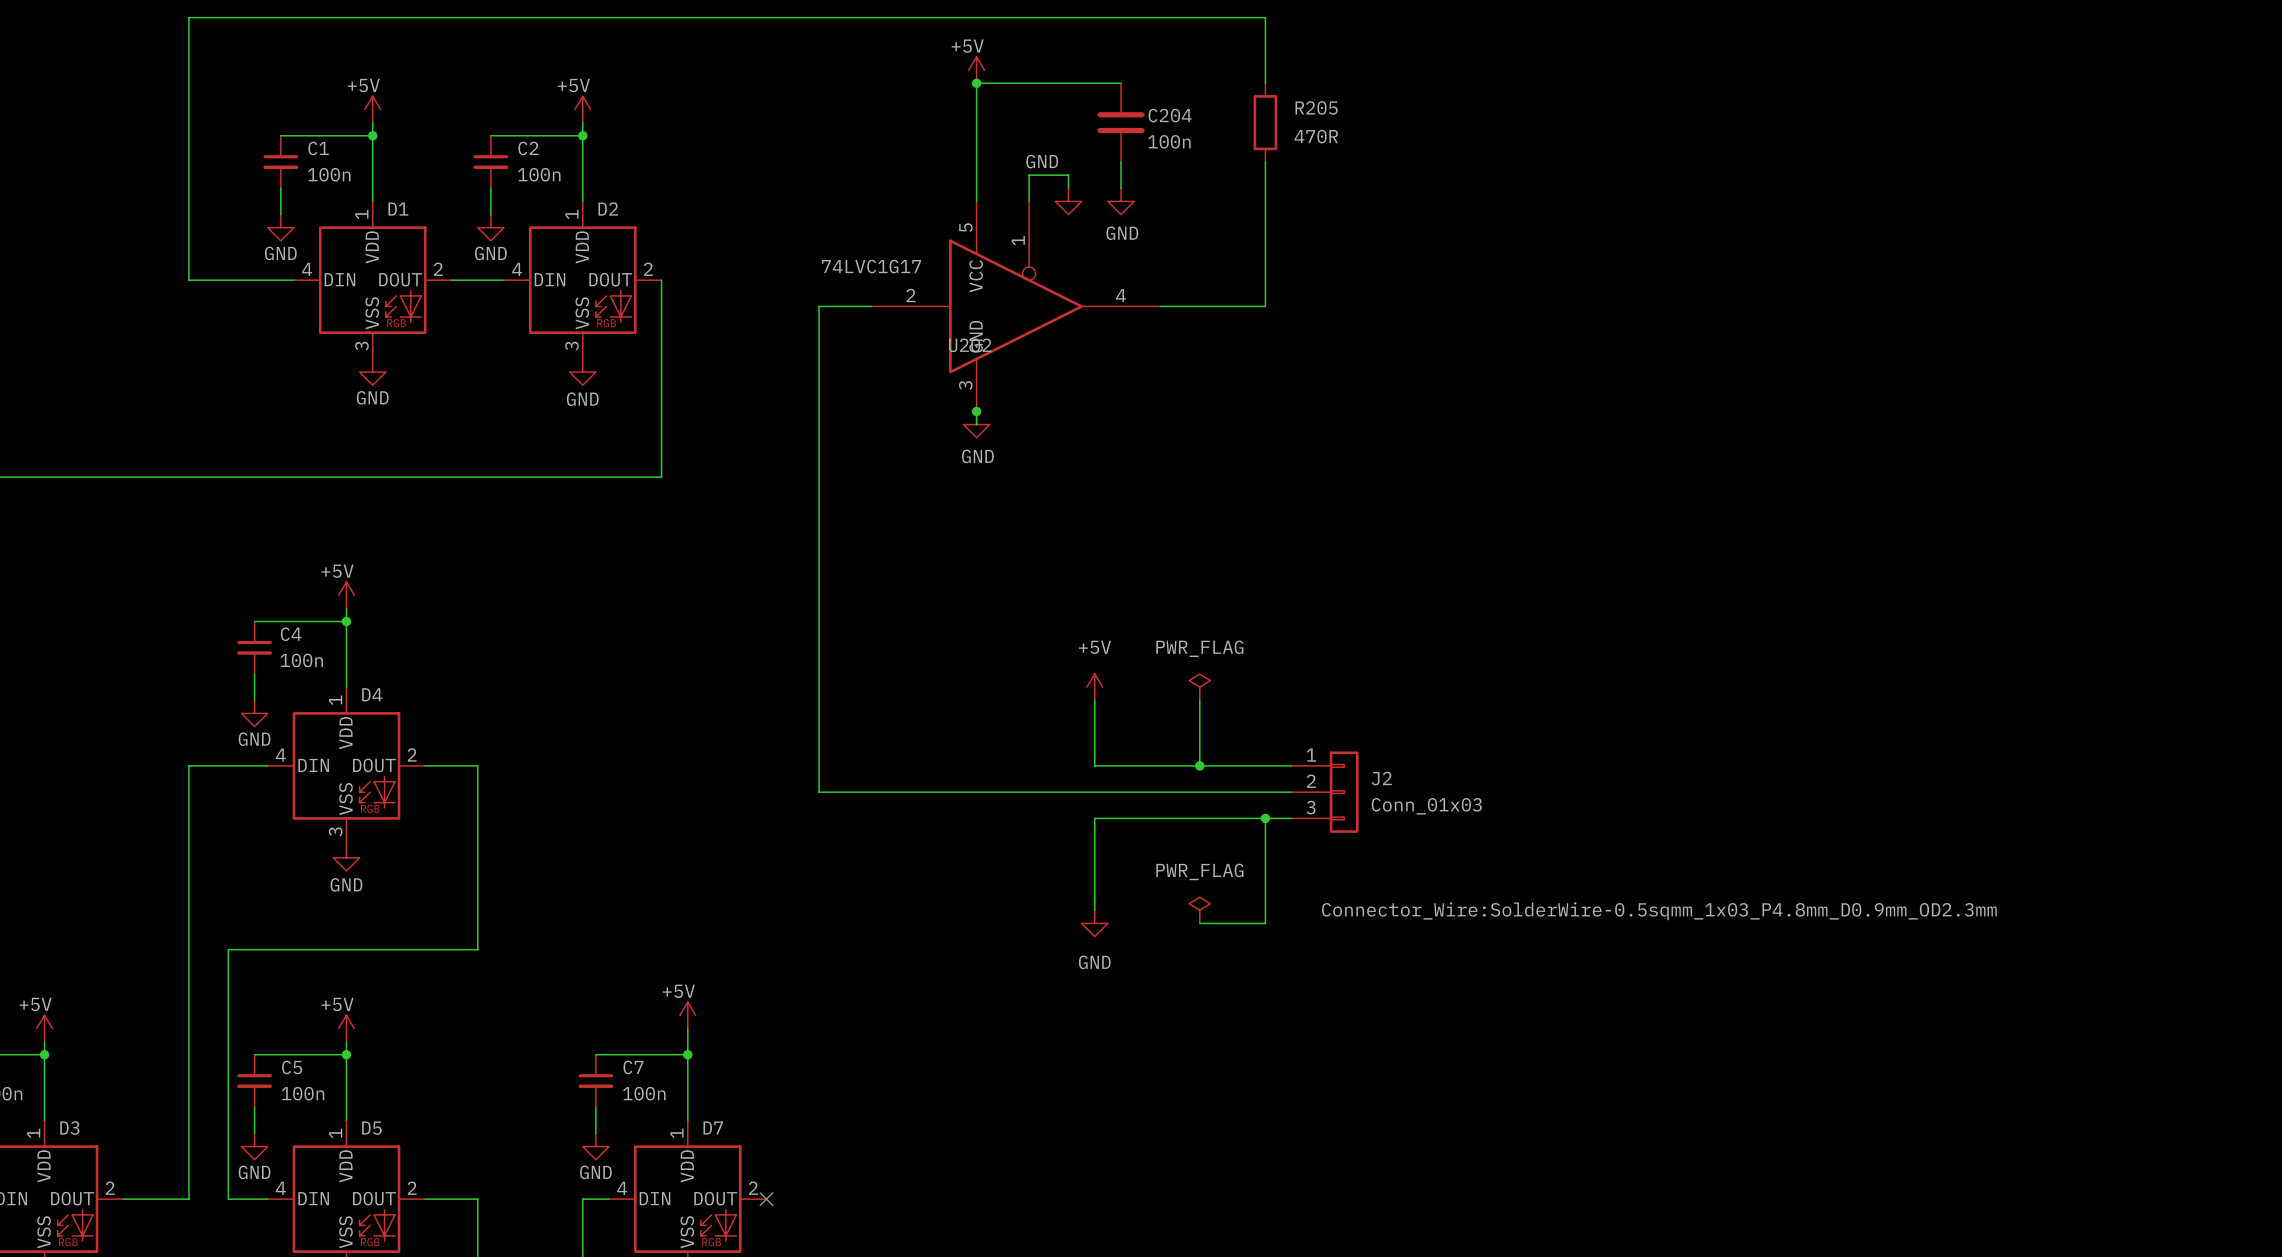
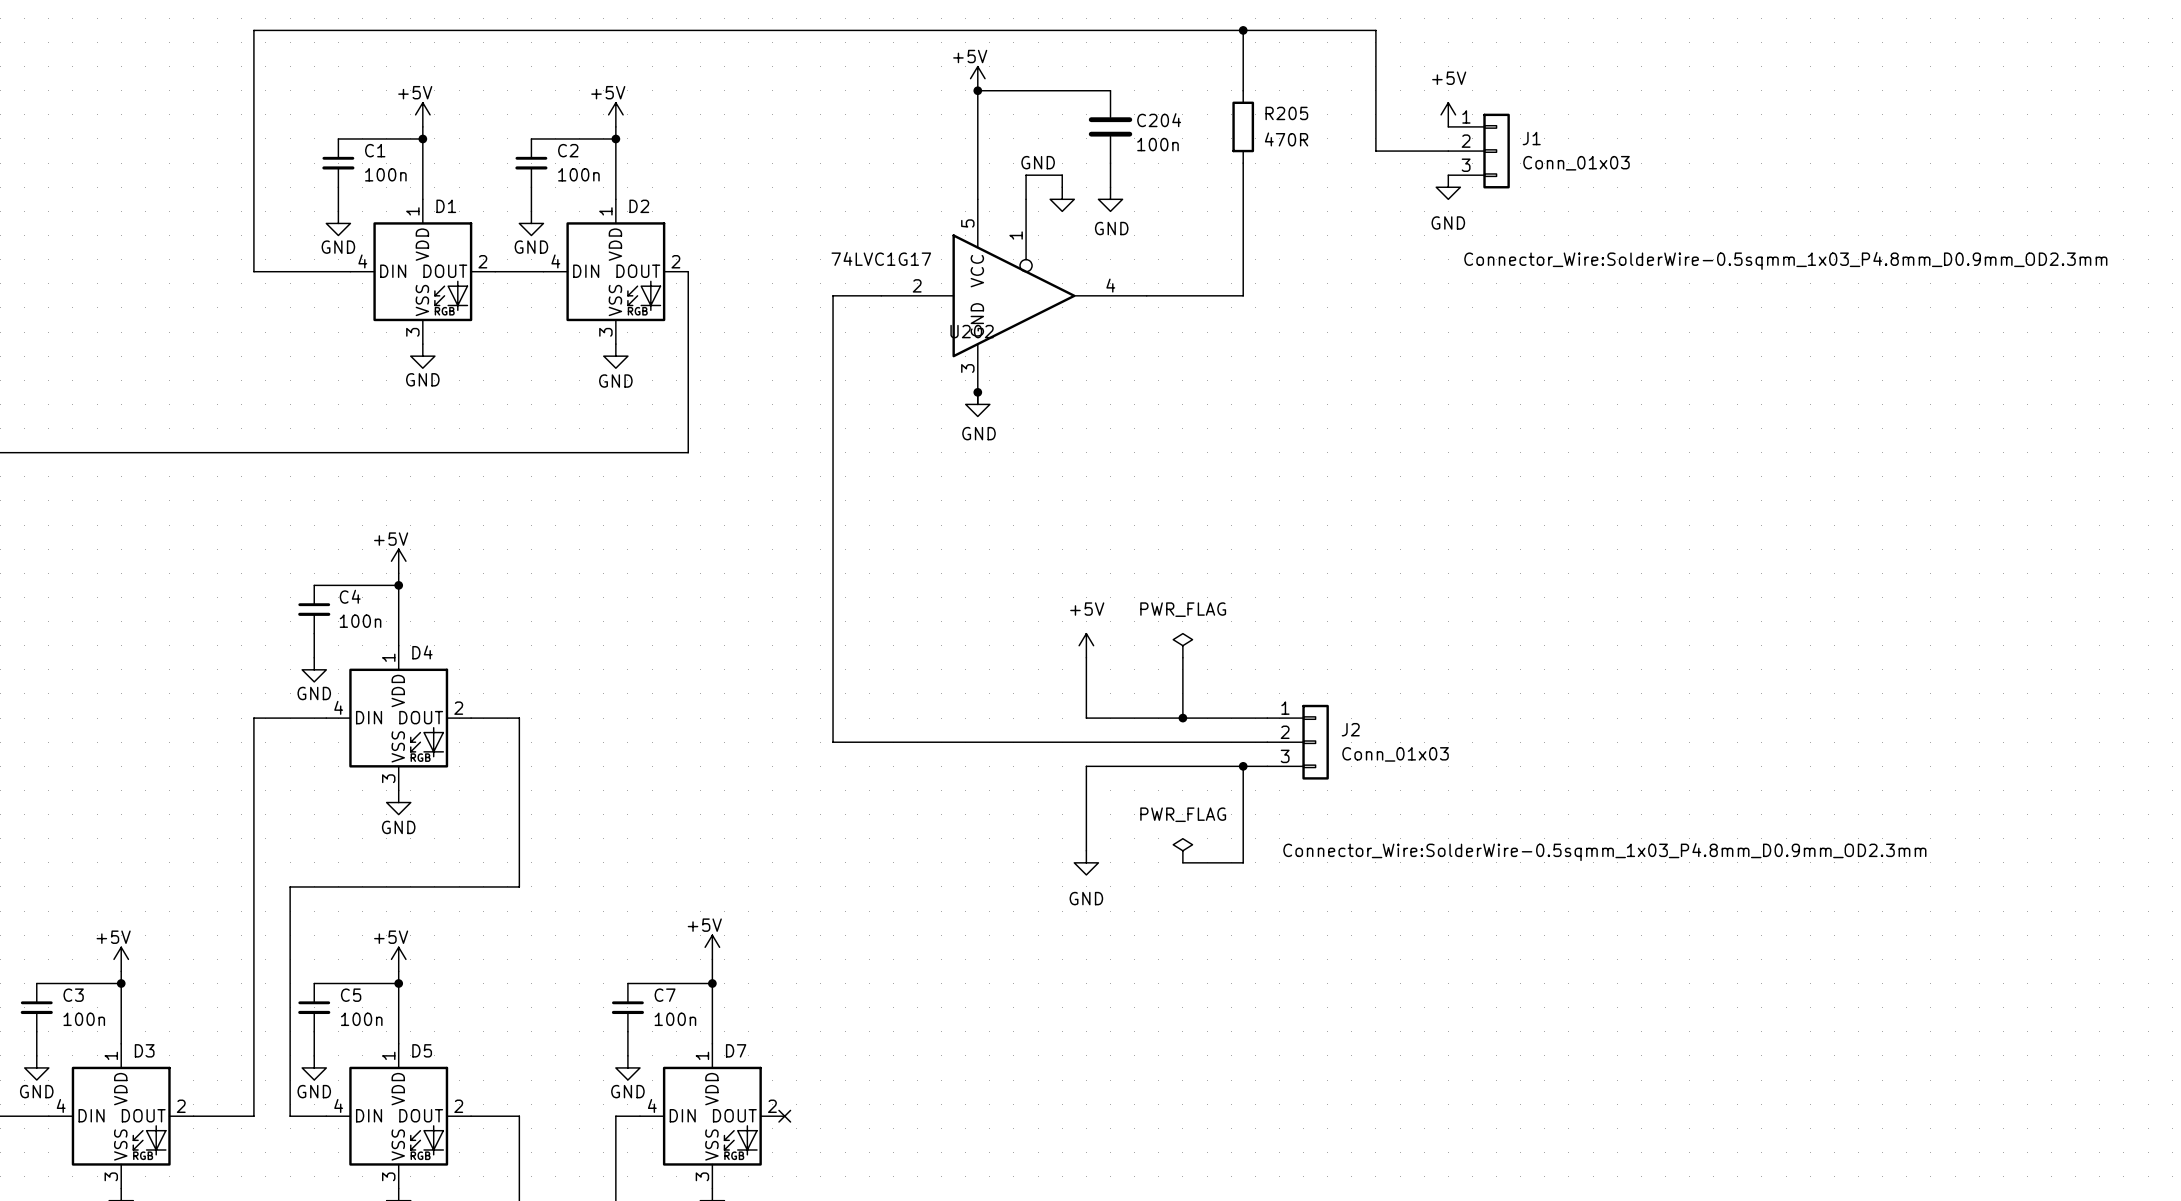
wire: none -> (1243, 30) (1375, 30) (1375, 151) (1448, 151)
junction: none -> (1243, 30)
power symbol: none -> +5V (1448, 114)
J1: none -> Conn_01x03 (1479, 151)
power symbol: none -> GND (1448, 187)

